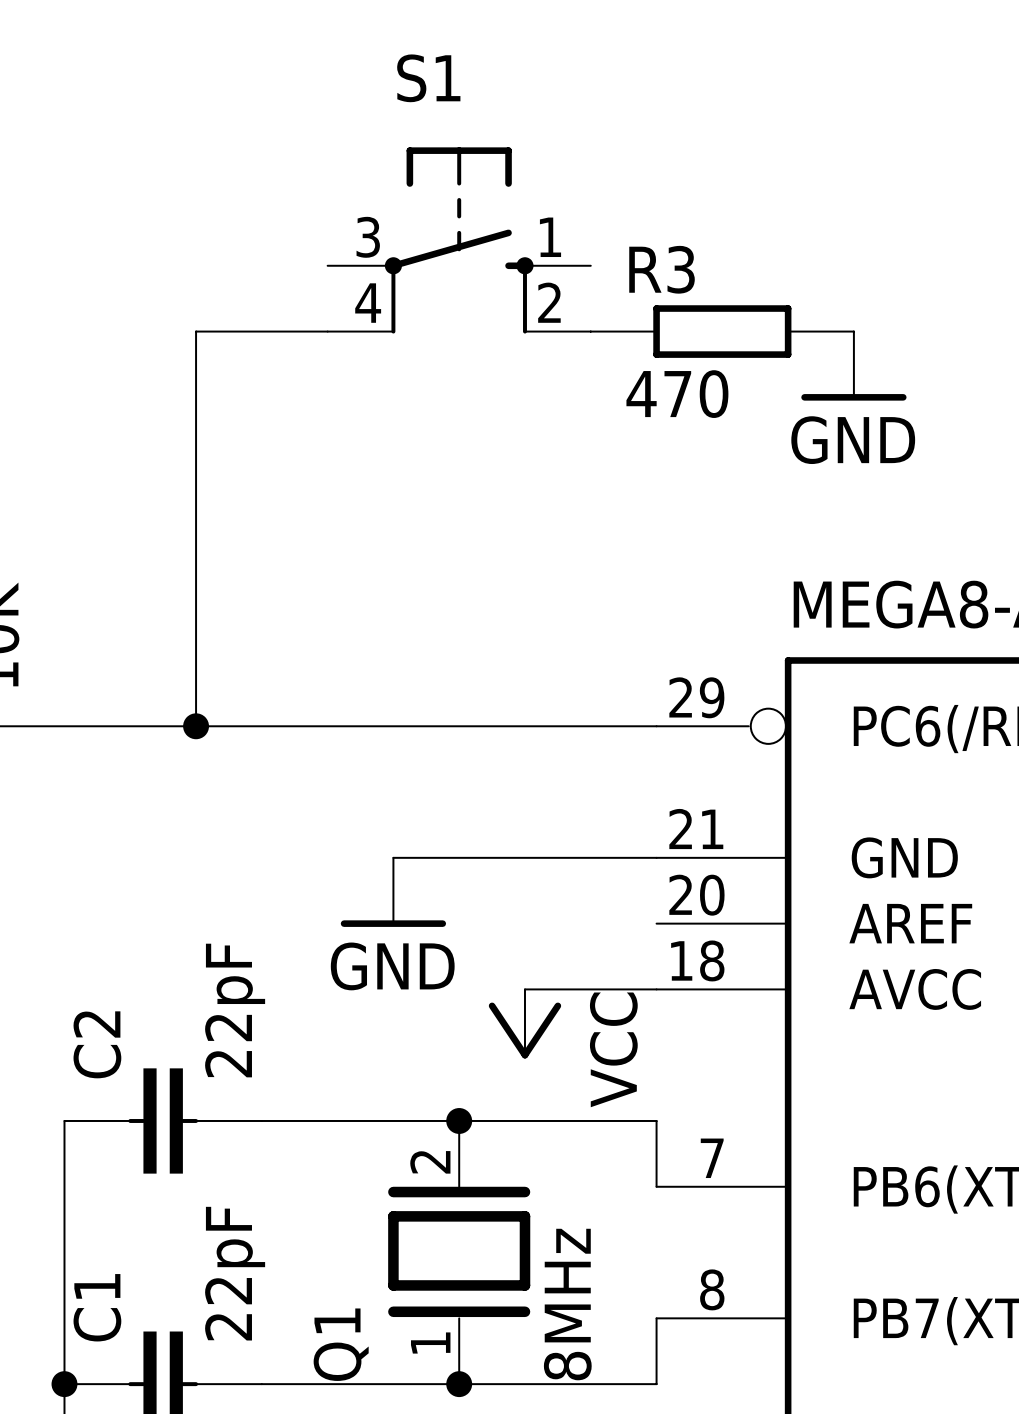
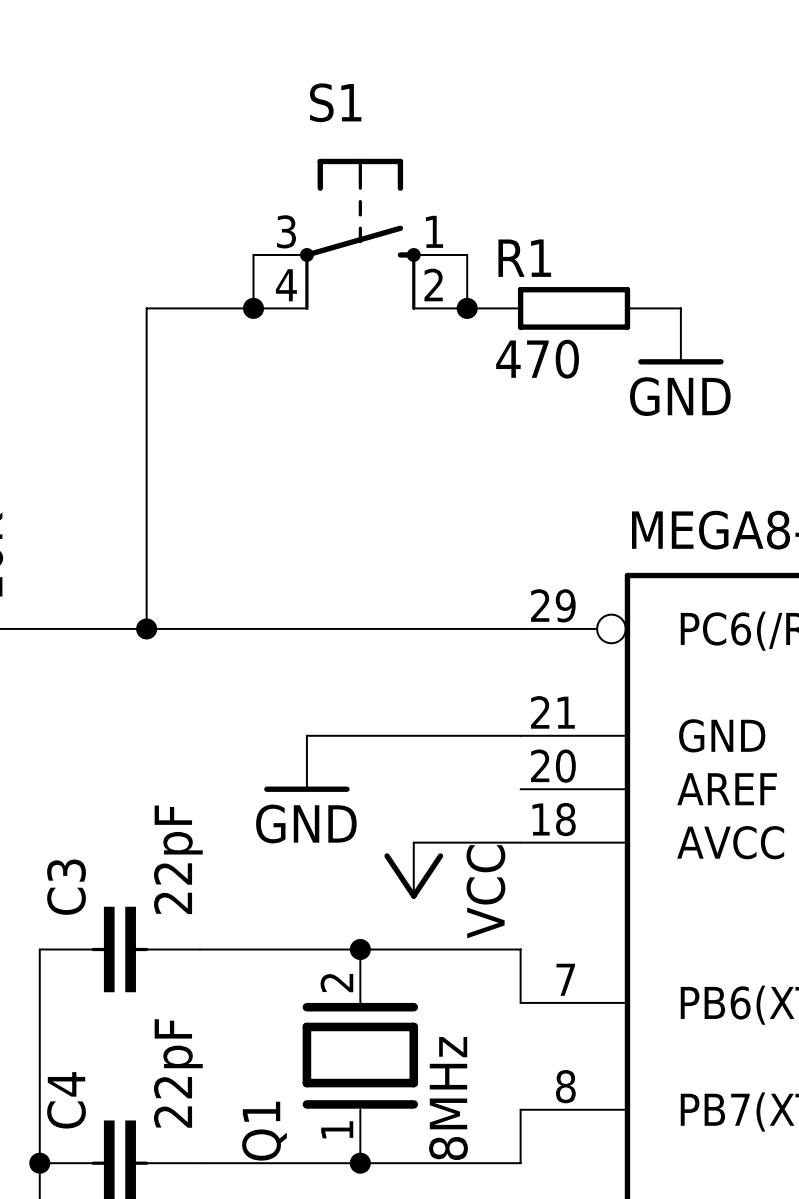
wire: none -> (253, 254) (253, 308)
wire: none -> (467, 254) (467, 308)
R3 name: R3 (662, 269) -> R1 (524, 258)
junction: none -> (253, 308)
junction: none -> (467, 308)
C2 name: C2 (97, 1044) -> C3 (66, 887)
C1 name: C1 (97, 1307) -> C4 (66, 1100)

